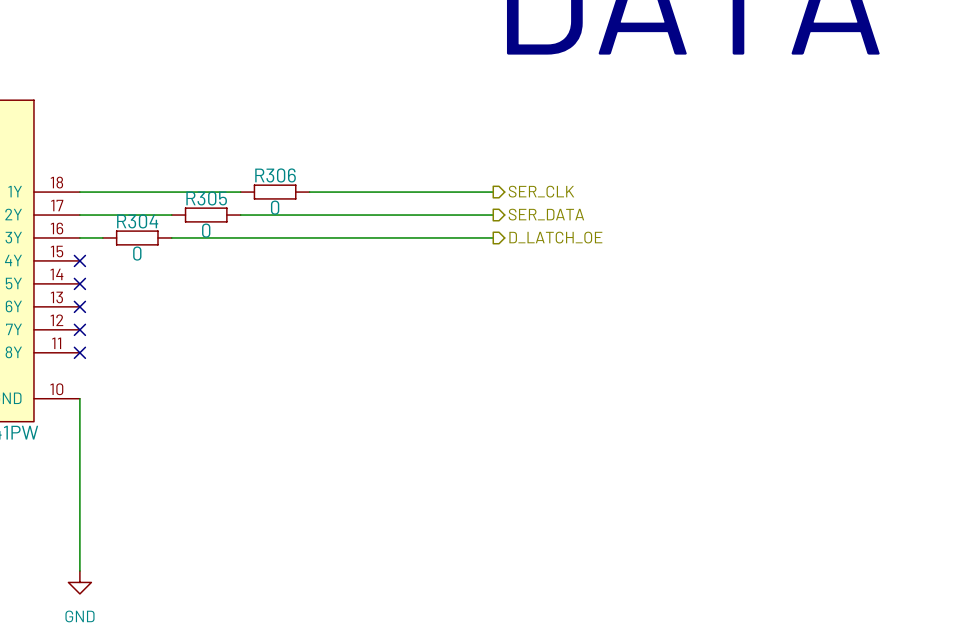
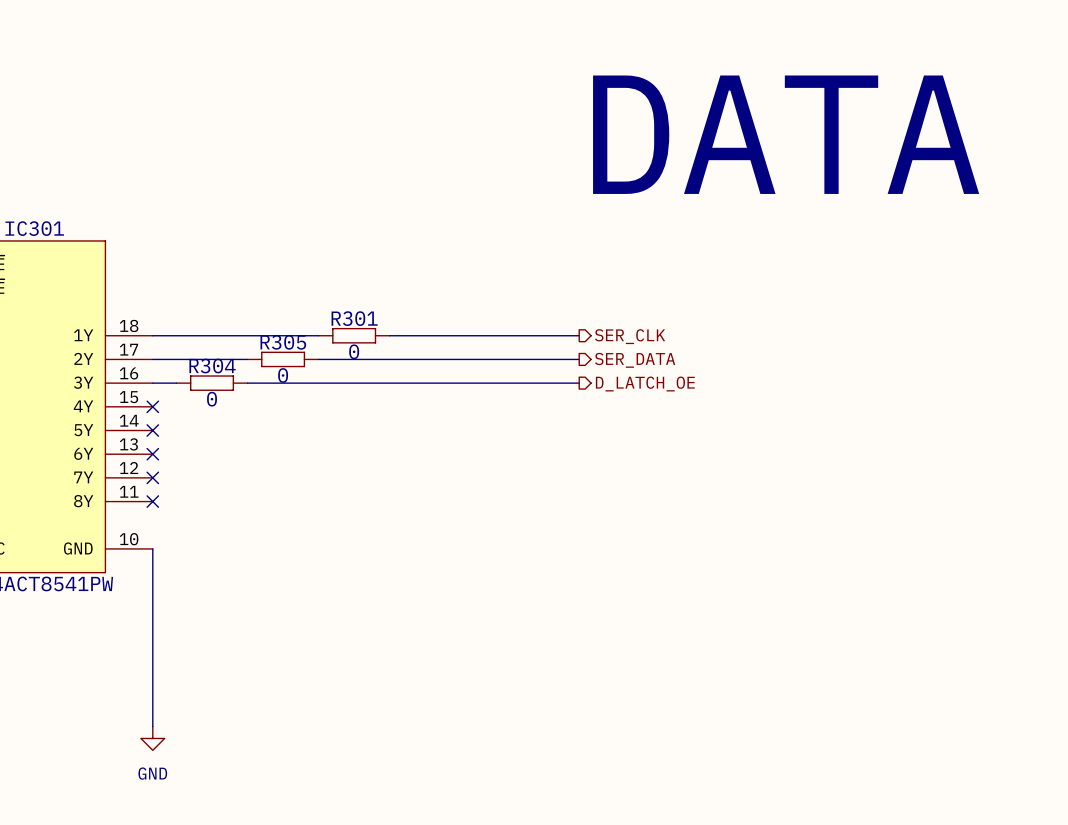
R306 name: R306 (275, 175) -> R301 (354, 318)

